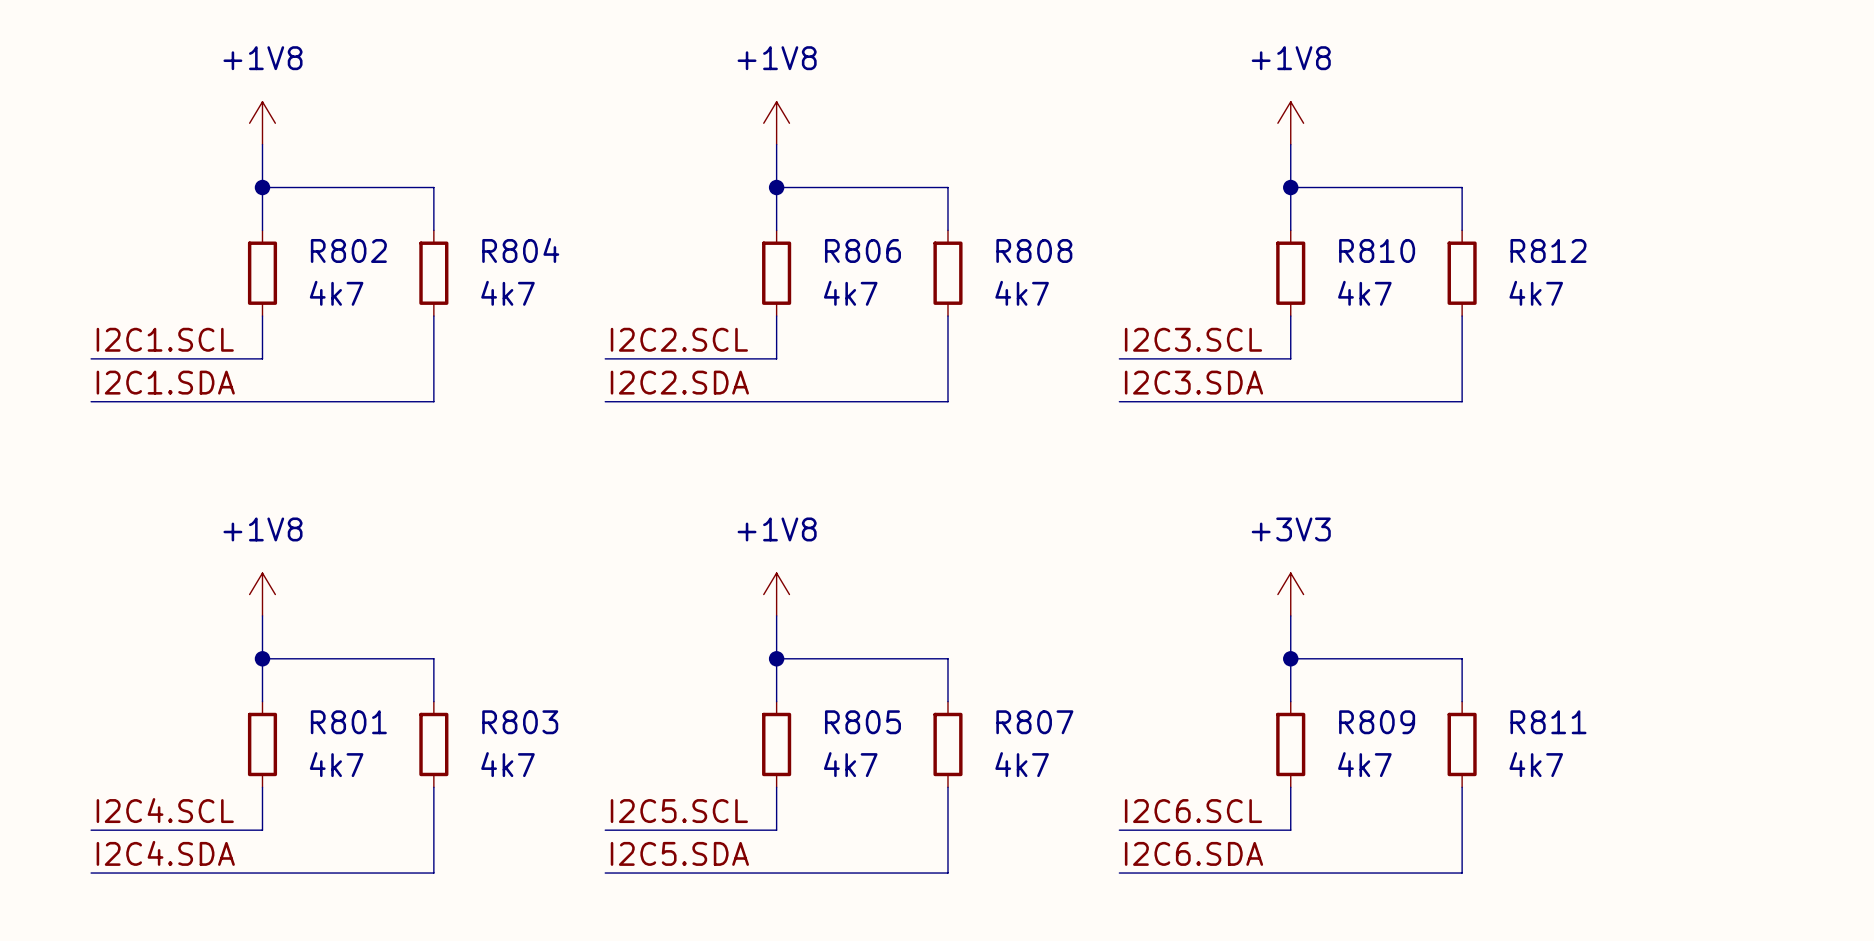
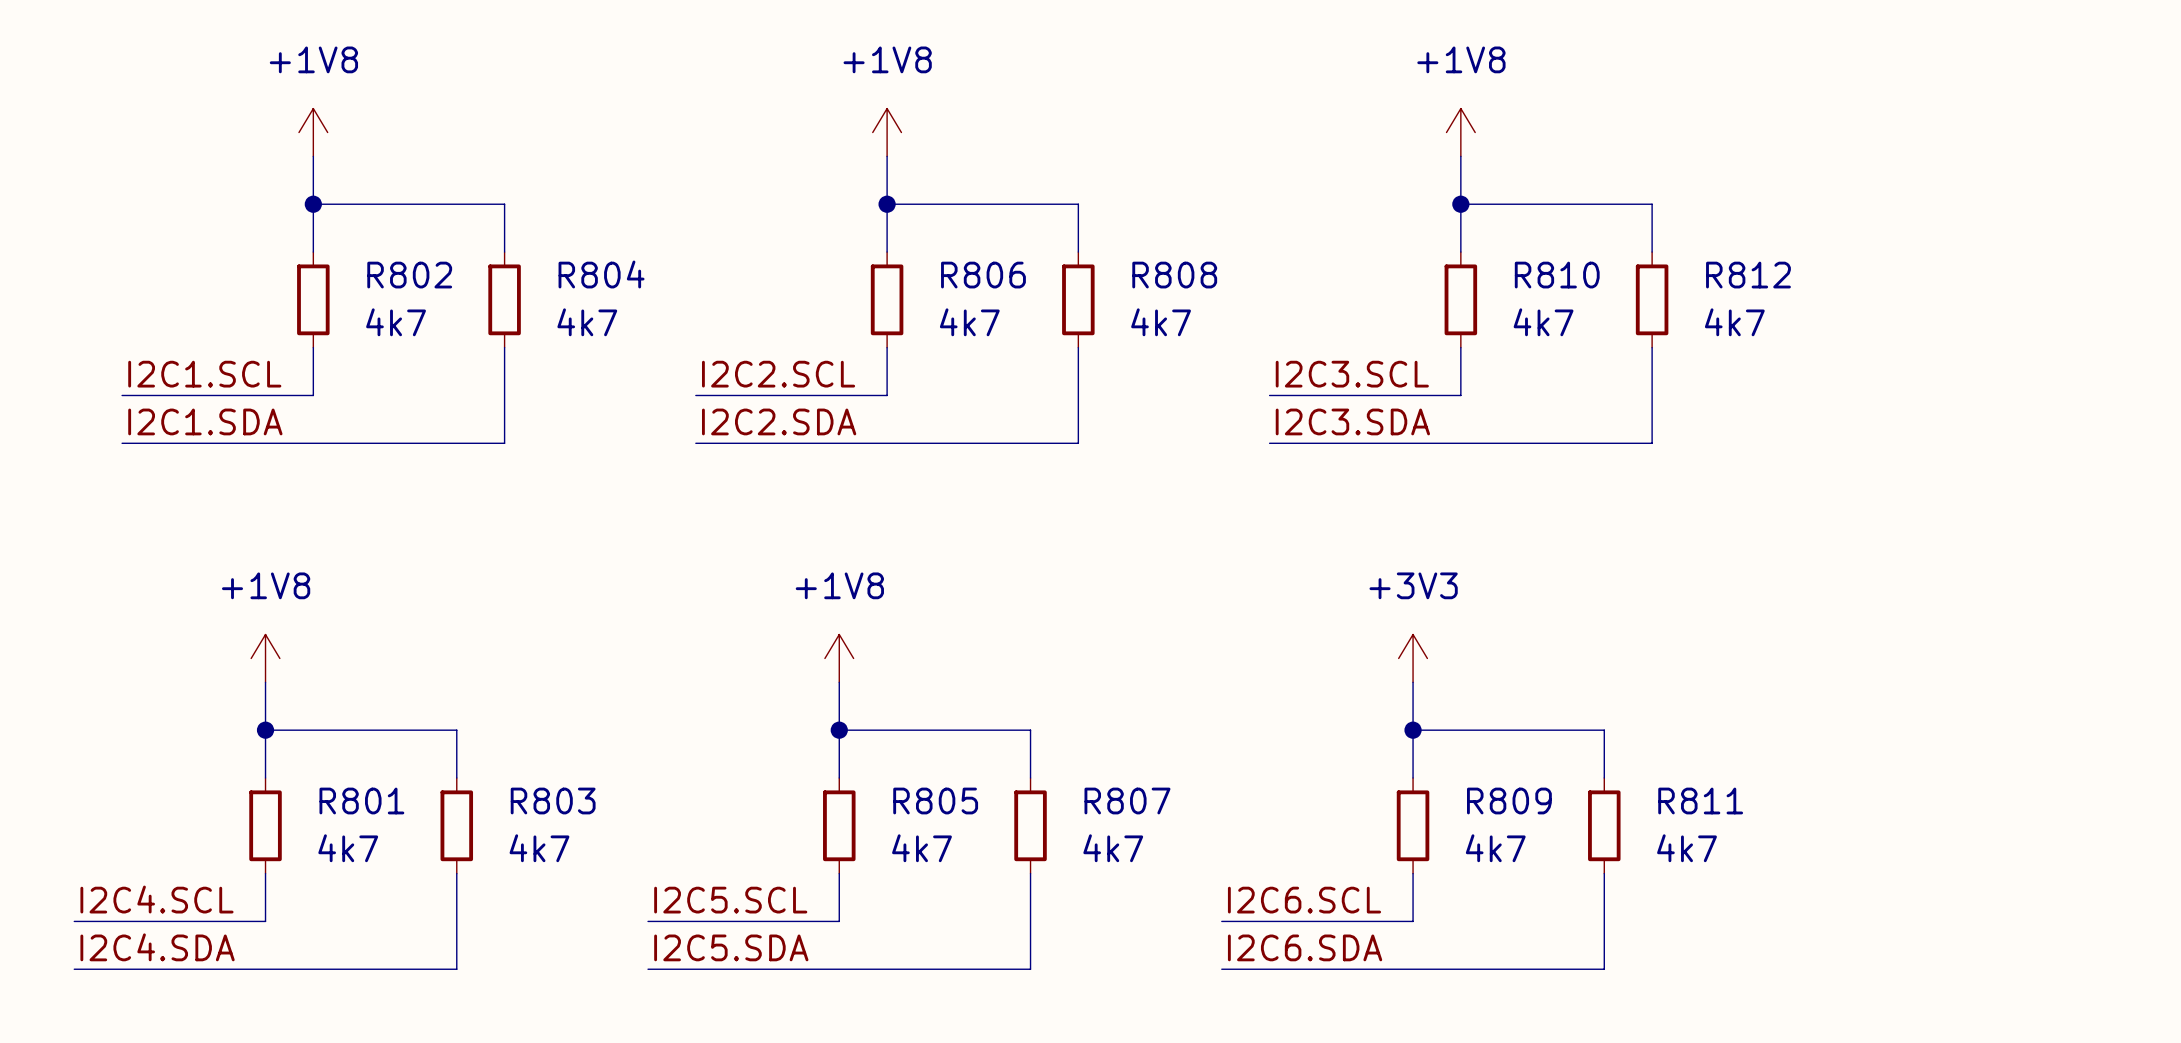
power symbol position: +1V8 (262, 594) -> +1V8 (265, 658)
power symbol position: +1V8 (776, 594) -> +1V8 (839, 658)
power symbol position: +3V3 (1290, 594) -> +3V3 (1413, 658)
wire: (262, 615) (262, 701) -> (265, 682) (265, 777)
wire: (776, 615) (776, 701) -> (839, 682) (839, 777)
wire: (1290, 615) (1290, 701) -> (1413, 682) (1413, 777)
wire: none -> (265, 730) (313, 730)
junction position: (262, 658) -> (265, 730)
wire: (391, 658) (433, 658) (433, 701) -> (456, 730) (456, 777)
wire: none -> (839, 730) (887, 730)
junction position: (776, 658) -> (839, 730)
wire: (905, 658) (947, 658) (947, 701) -> (1030, 730) (1030, 777)
wire: none -> (1413, 730) (1460, 730)
junction position: (1290, 658) -> (1413, 730)
wire: (1419, 658) (1462, 658) (1462, 701) -> (1604, 730) (1604, 777)
R801 position: (262, 744) -> (265, 825)
R803 position: (433, 744) -> (456, 825)
R805 position: (776, 744) -> (839, 825)
R807 position: (947, 744) -> (1030, 825)
R809 position: (1290, 744) -> (1413, 825)
R811 position: (1462, 744) -> (1604, 825)
wire: (262, 787) (262, 830) (219, 830) -> (265, 873) (265, 921)
wire: (433, 787) (433, 873) (391, 873) -> (456, 873) (456, 969)
wire: (776, 787) (776, 830) (733, 830) -> (839, 873) (839, 921)
wire: (947, 787) (947, 873) (905, 873) -> (1030, 873) (1030, 969)
wire: (1290, 787) (1290, 830) (1247, 830) -> (1413, 873) (1413, 921)
wire: (1462, 787) (1462, 873) (1419, 873) -> (1604, 873) (1604, 969)
label position: I2C4.SCL (165, 810) -> I2C4.SCL (156, 899)
label position: I2C5.SCL (679, 811) -> I2C5.SCL (730, 900)
label position: I2C6.SCL (1193, 811) -> I2C6.SCL (1304, 900)
wire: none -> (74, 921) (122, 921)
wire: none -> (648, 921) (695, 921)
wire: none -> (1221, 921) (1269, 921)
label position: I2C4.SDA (165, 853) -> I2C4.SDA (157, 947)
label position: I2C5.SDA (679, 853) -> I2C5.SDA (731, 947)
label position: I2C6.SDA (1193, 853) -> I2C6.SDA (1305, 947)
wire: none -> (74, 969) (122, 969)
wire: none -> (648, 969) (695, 969)
wire: none -> (1221, 969) (1269, 969)

